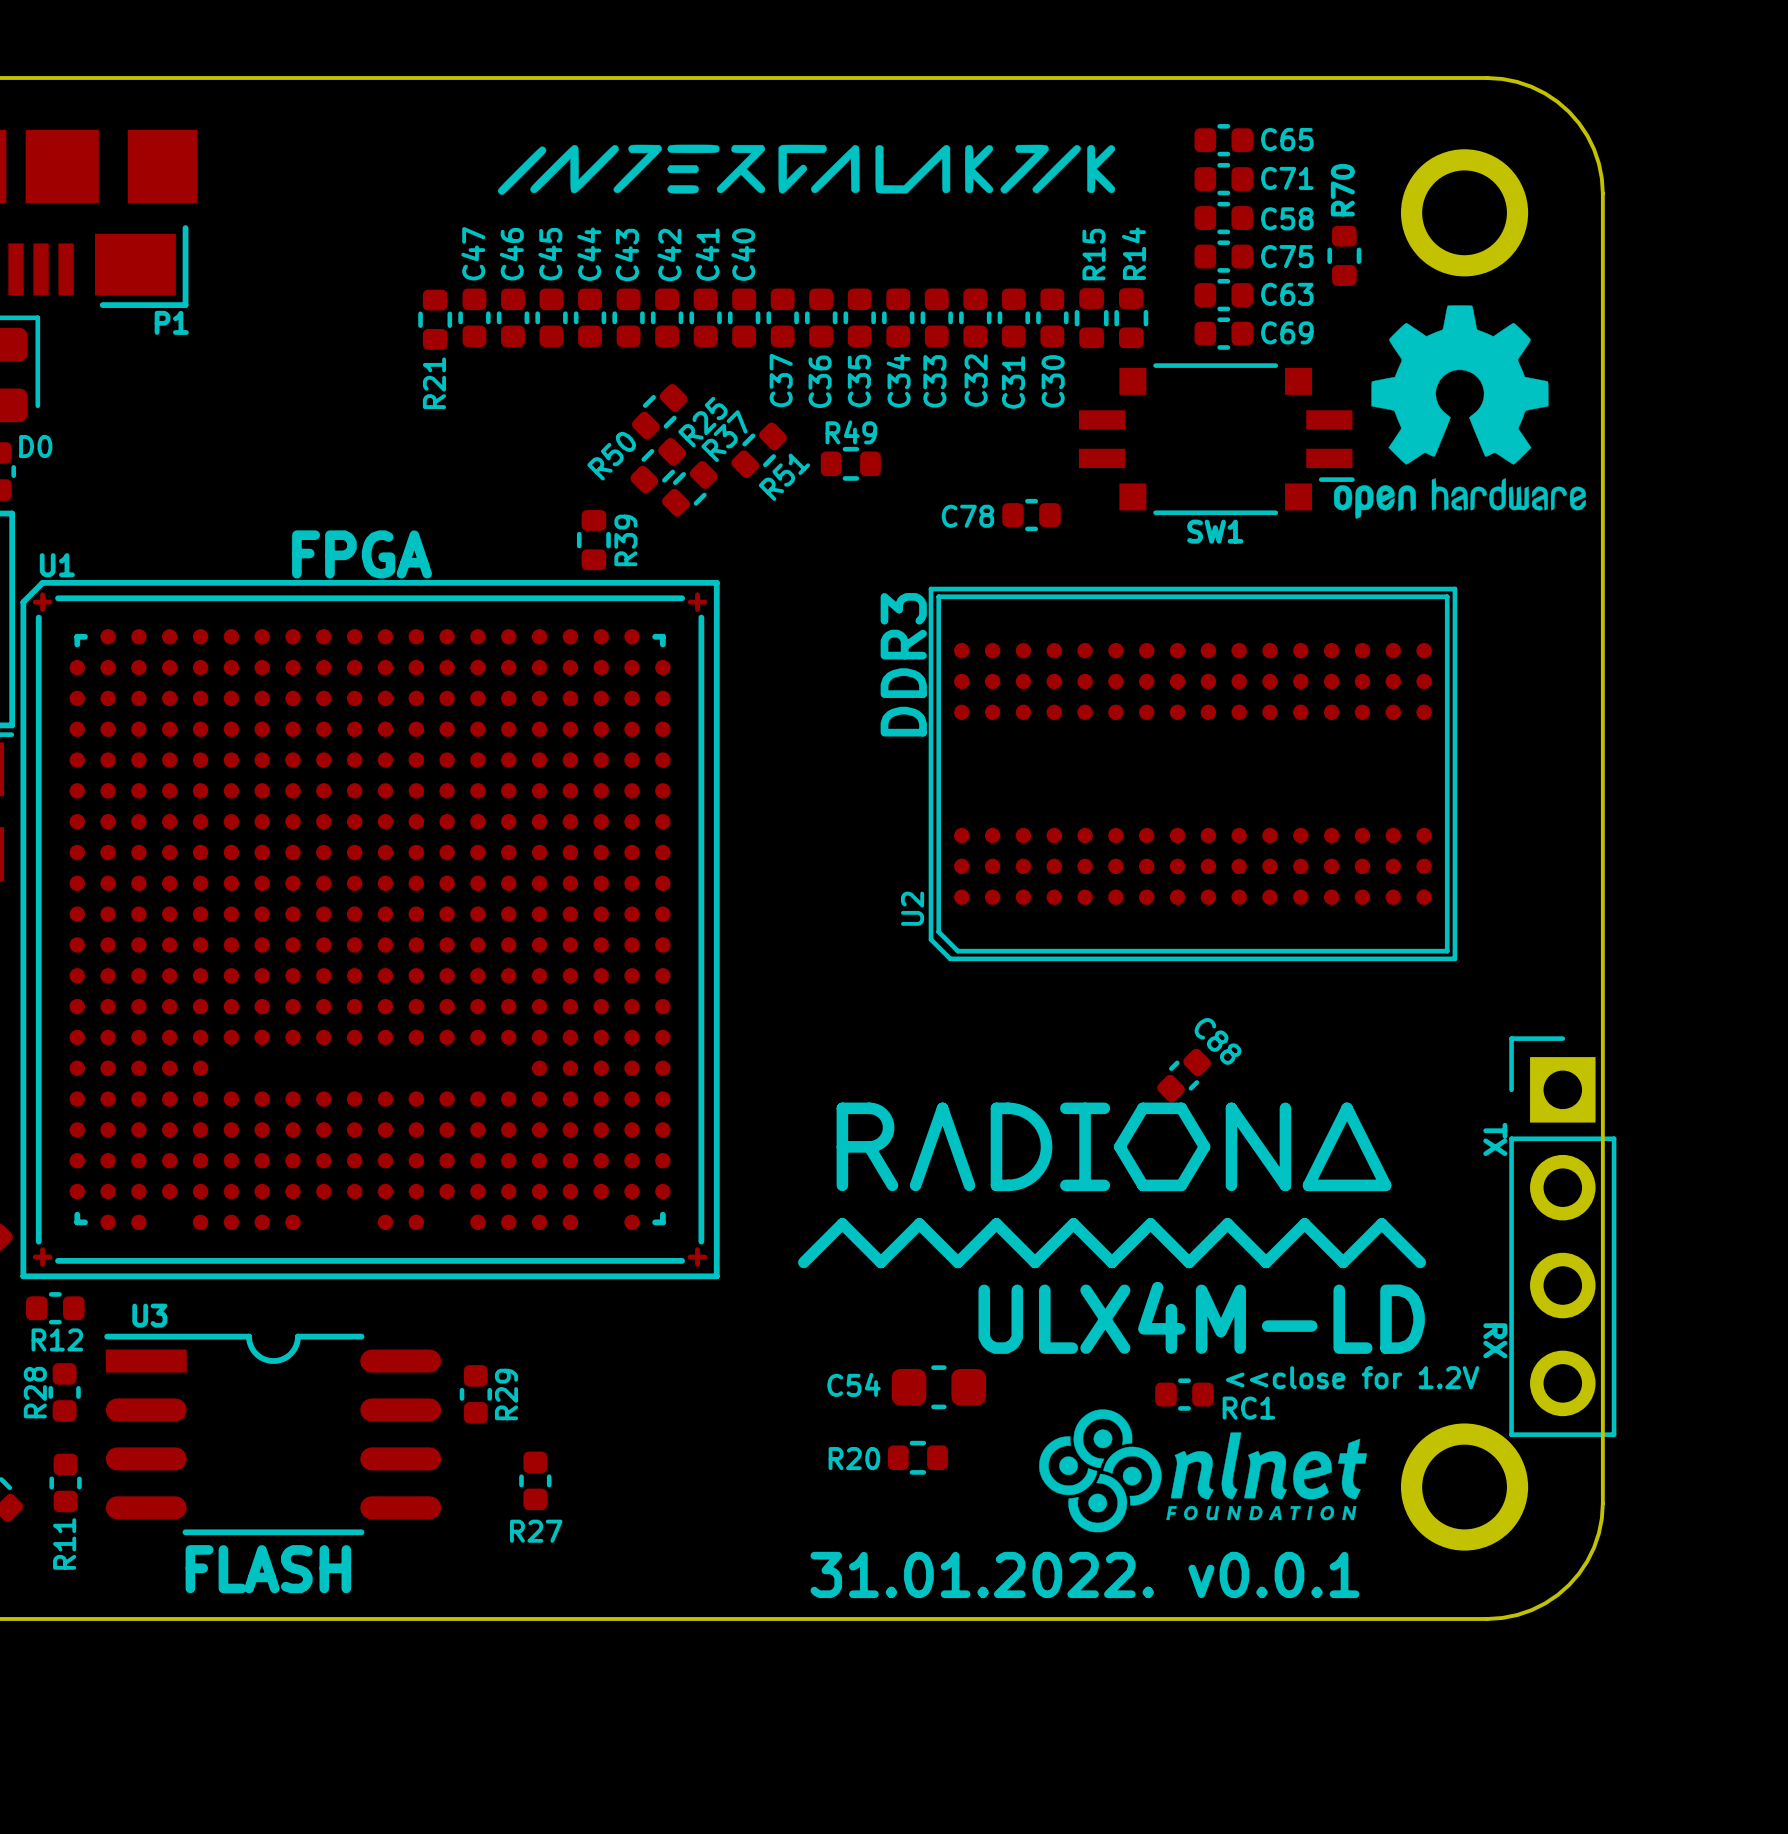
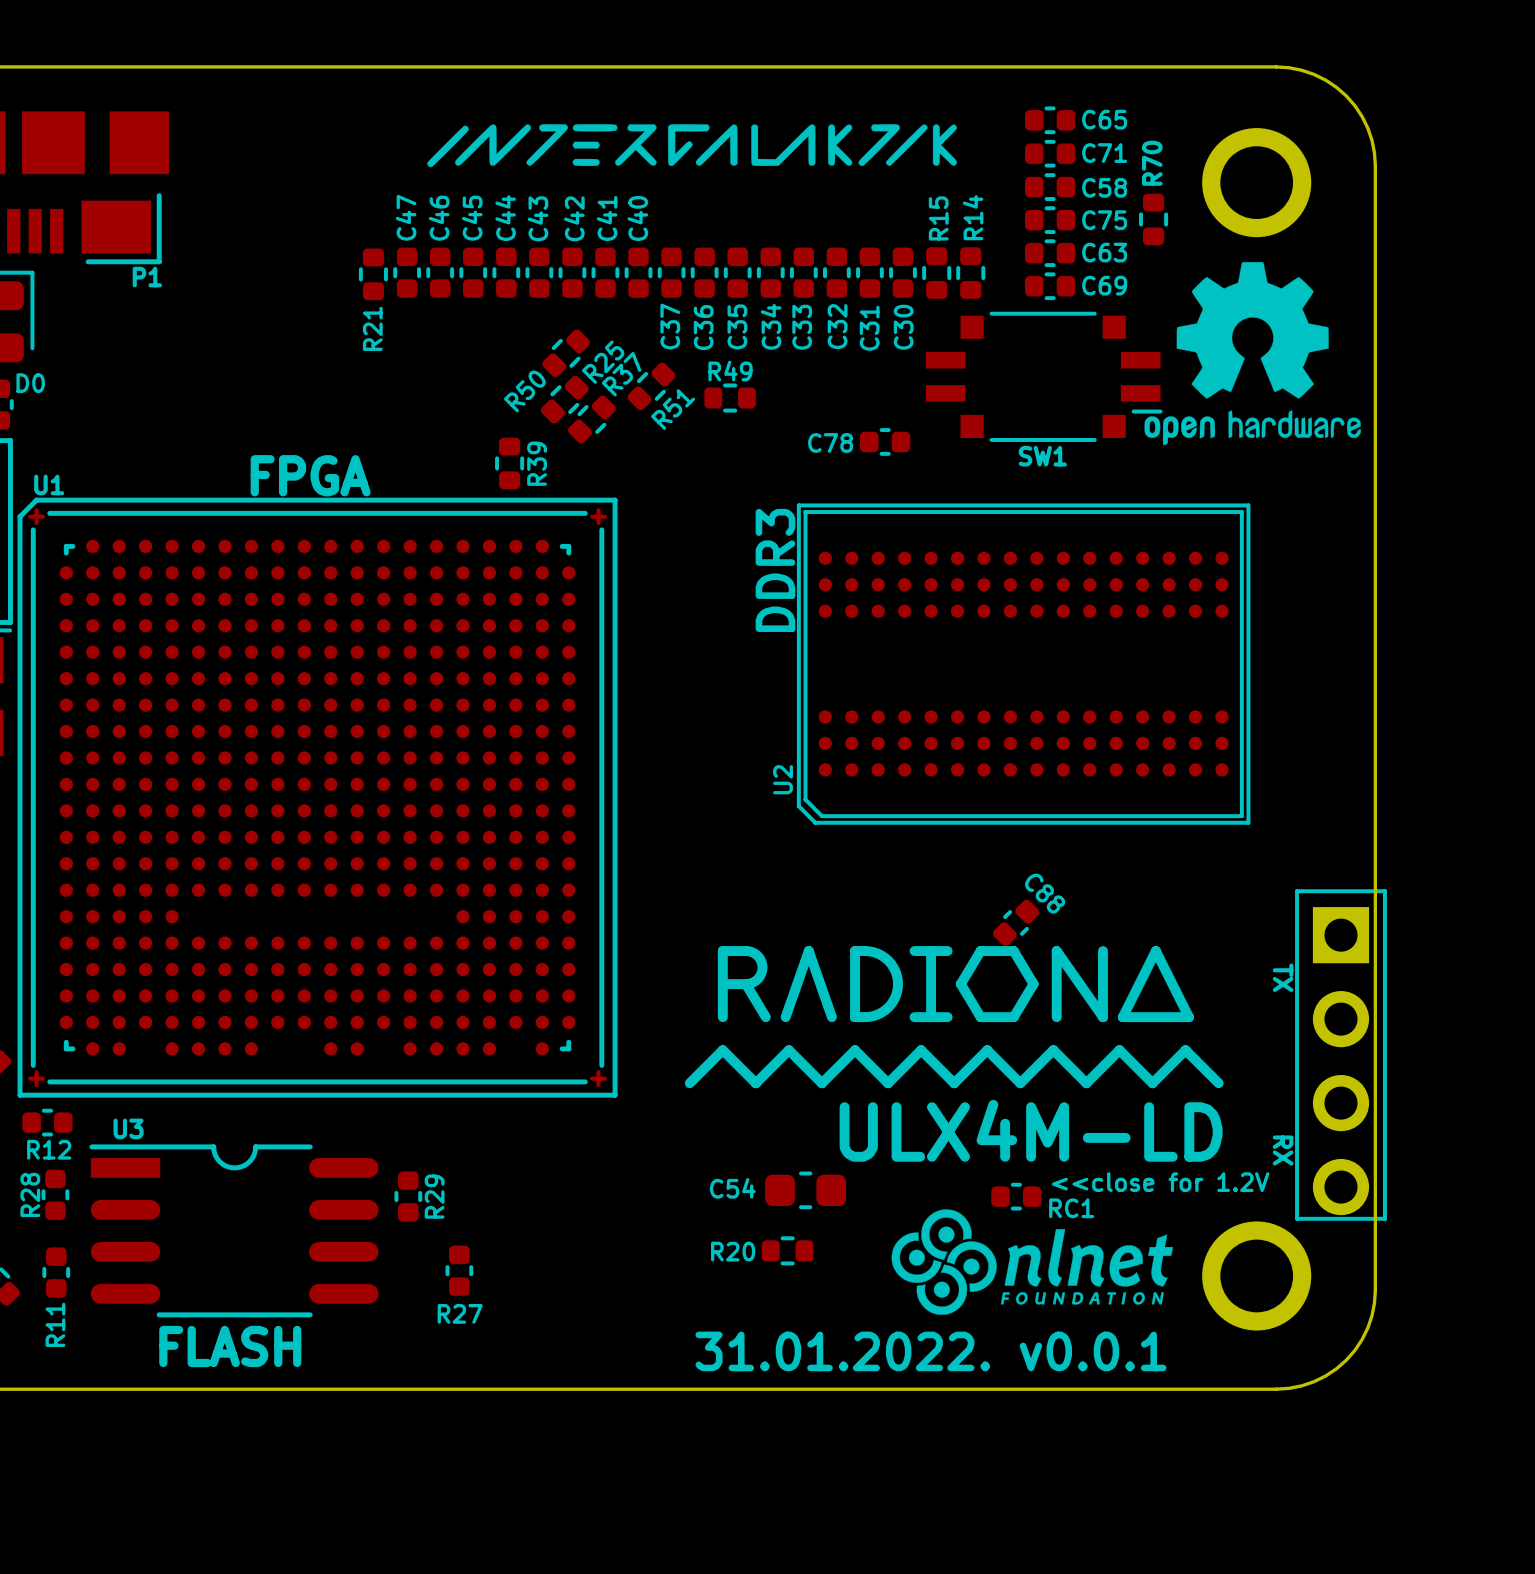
part footprint: [1509, 1036, 1617, 1437] -> [1295, 889, 1387, 1221]

